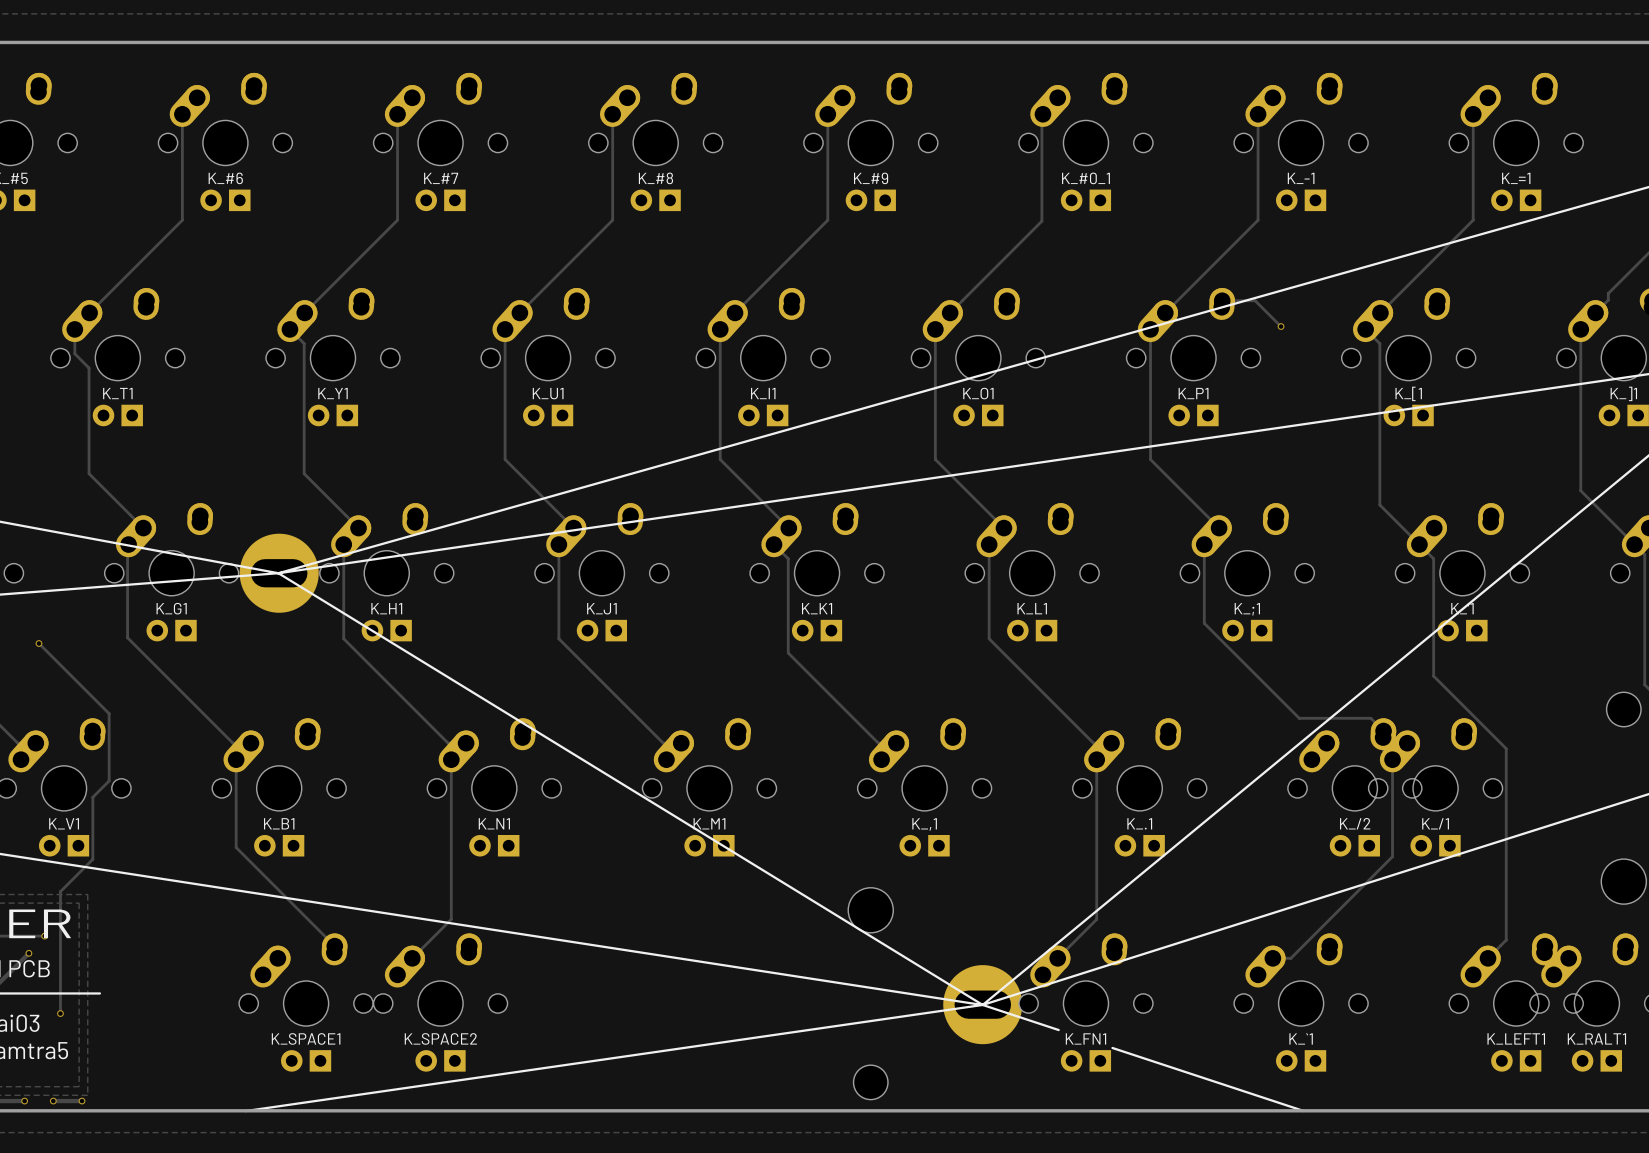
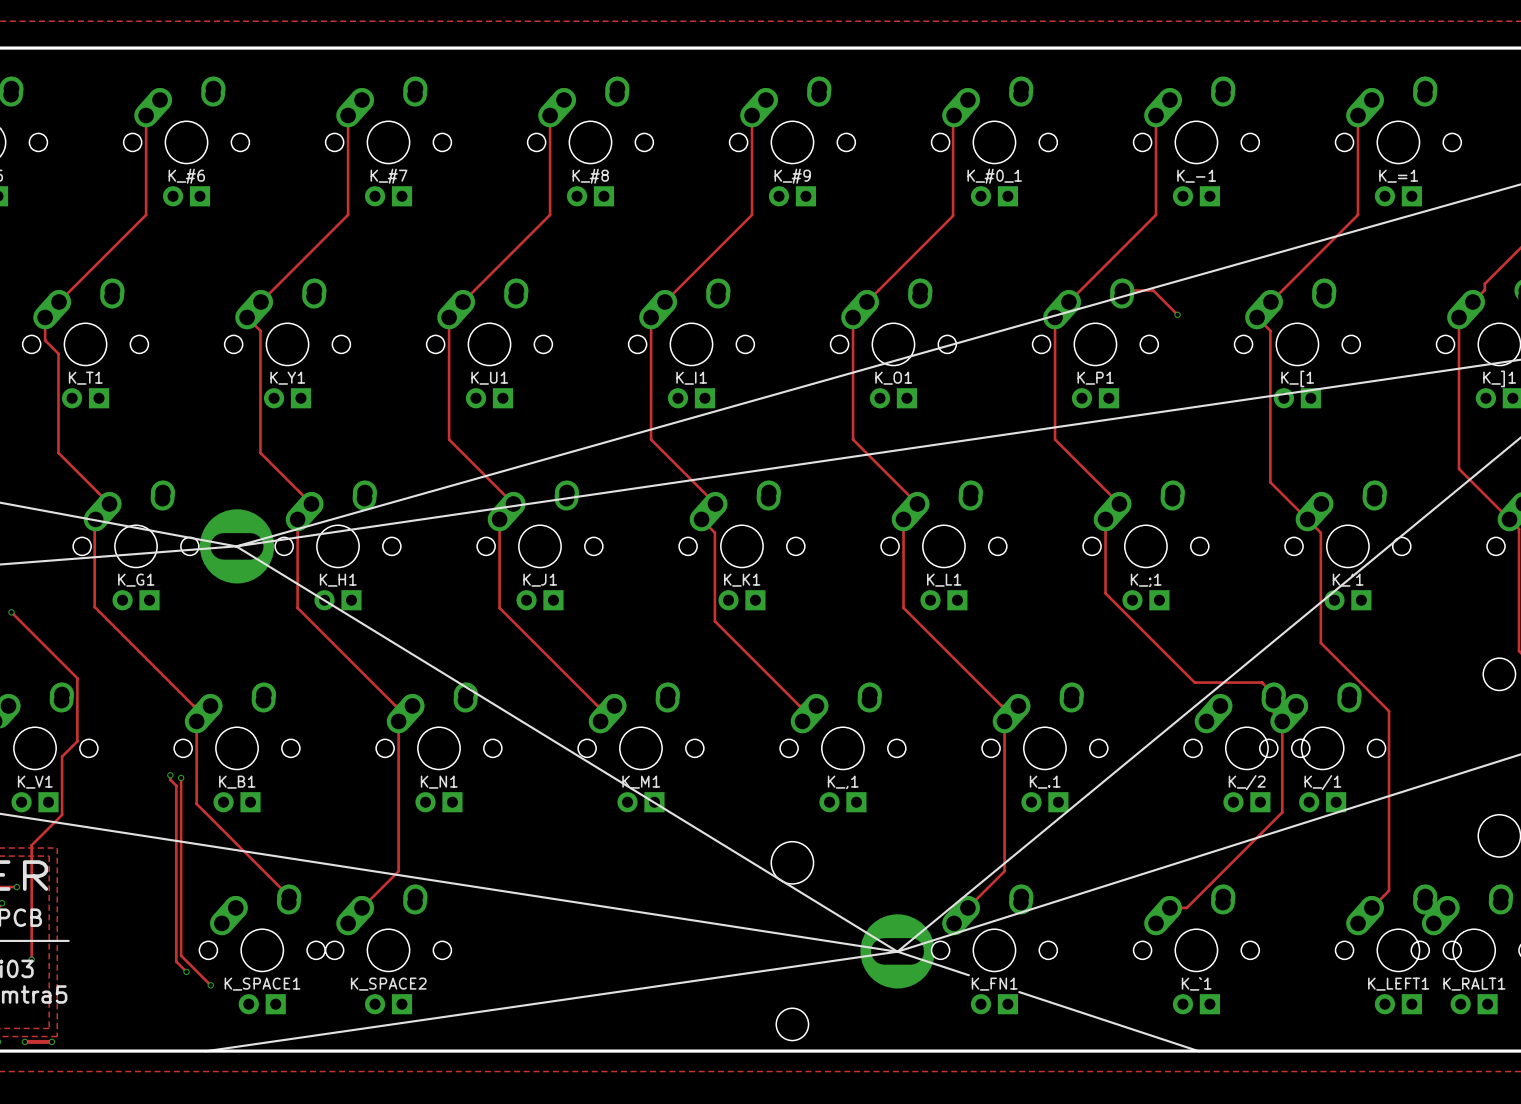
track: none -> (170, 775) (170, 779) (176, 785) (176, 961) (186, 971)
via: none -> (170, 775)
track: none -> (181, 777) (181, 955) (210, 985)
via: none -> (181, 777)
via: none -> (186, 971)
via: none -> (210, 985)

